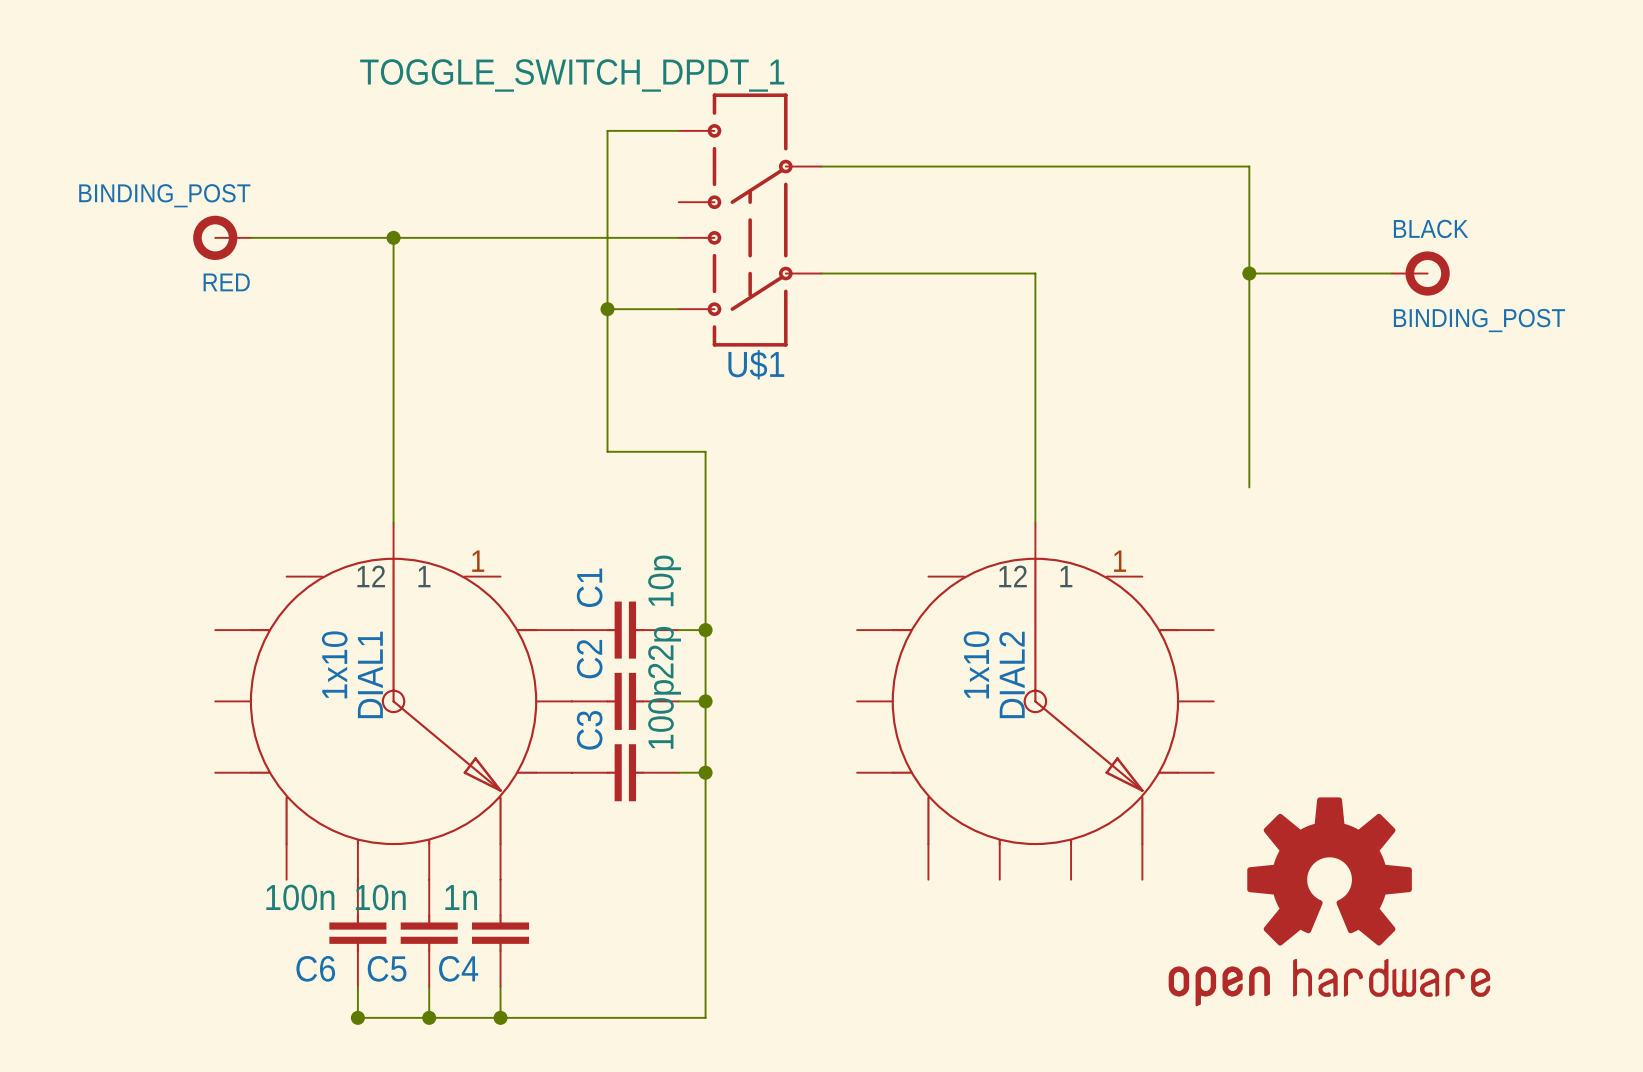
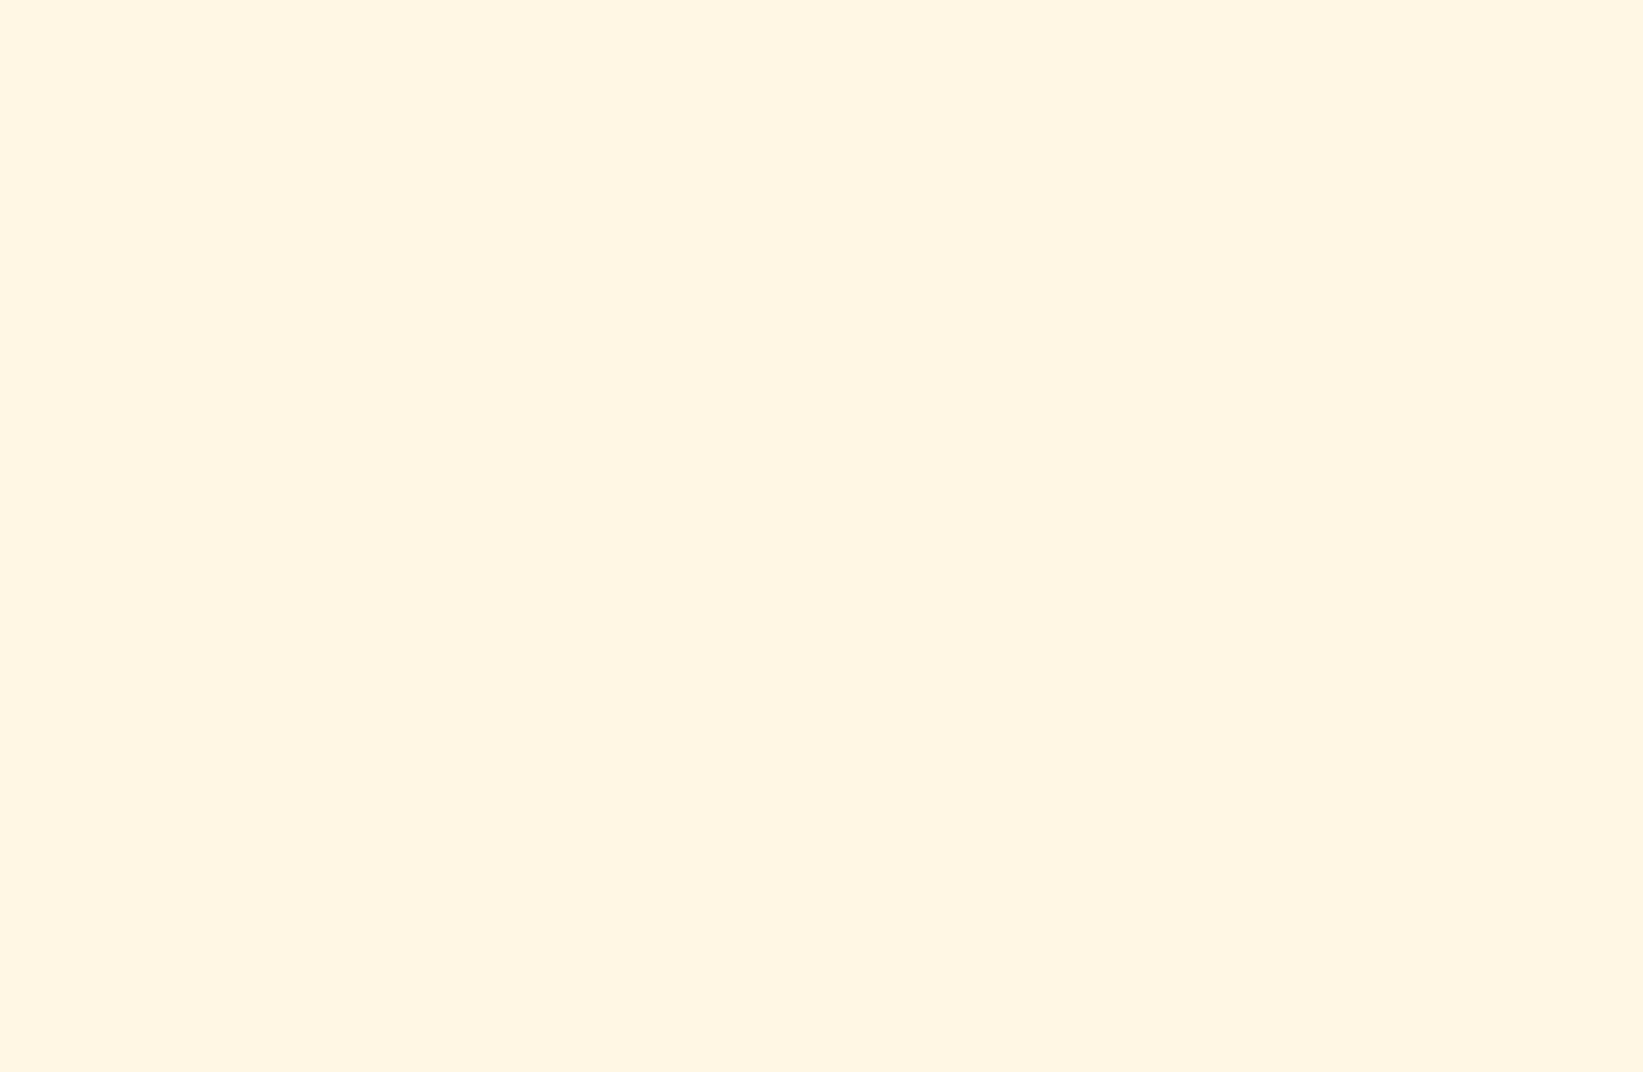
wire: (678, 130) (607, 130) (607, 451) (705, 451) (705, 1017) (357, 1017) (357, 986) -> none
wire: (821, 166) (1249, 166) (1249, 487) -> none
U$1: TOGGLE_SWITCH_DPDT_1 (750, 220) -> none
RED: BINDING_POST (222, 237) -> none
wire: (250, 237) (678, 237) -> none
wire: (393, 237) (393, 523) -> none
junction: (393, 237) -> none
wire: (821, 273) (1035, 273) (1035, 523) -> none
wire: (1249, 273) (1391, 273) -> none
junction: (1249, 273) -> none
BLACK: BINDING_POST (1420, 273) -> none
wire: (607, 309) (678, 309) -> none
junction: (607, 309) -> none
C1: 10p (625, 630) -> none
wire: (678, 630) (705, 630) -> none
junction: (705, 630) -> none
DIAL1: 1x10 (393, 701) -> none
C2: 22p (625, 701) -> none
wire: (678, 701) (705, 701) -> none
junction: (705, 701) -> none
DIAL2: 1x10 (1035, 701) -> none
C3: 100p (625, 772) -> none
wire: (678, 772) (705, 772) -> none
junction: (705, 772) -> none
part: (1329, 901) -> none
C6: 100n (357, 933) -> none
C5: 10n (429, 933) -> none
C4: 1n (500, 933) -> none
wire: (429, 986) (429, 1017) -> none
wire: (500, 986) (500, 1017) -> none
junction: (357, 1017) -> none
junction: (429, 1017) -> none
junction: (500, 1017) -> none

